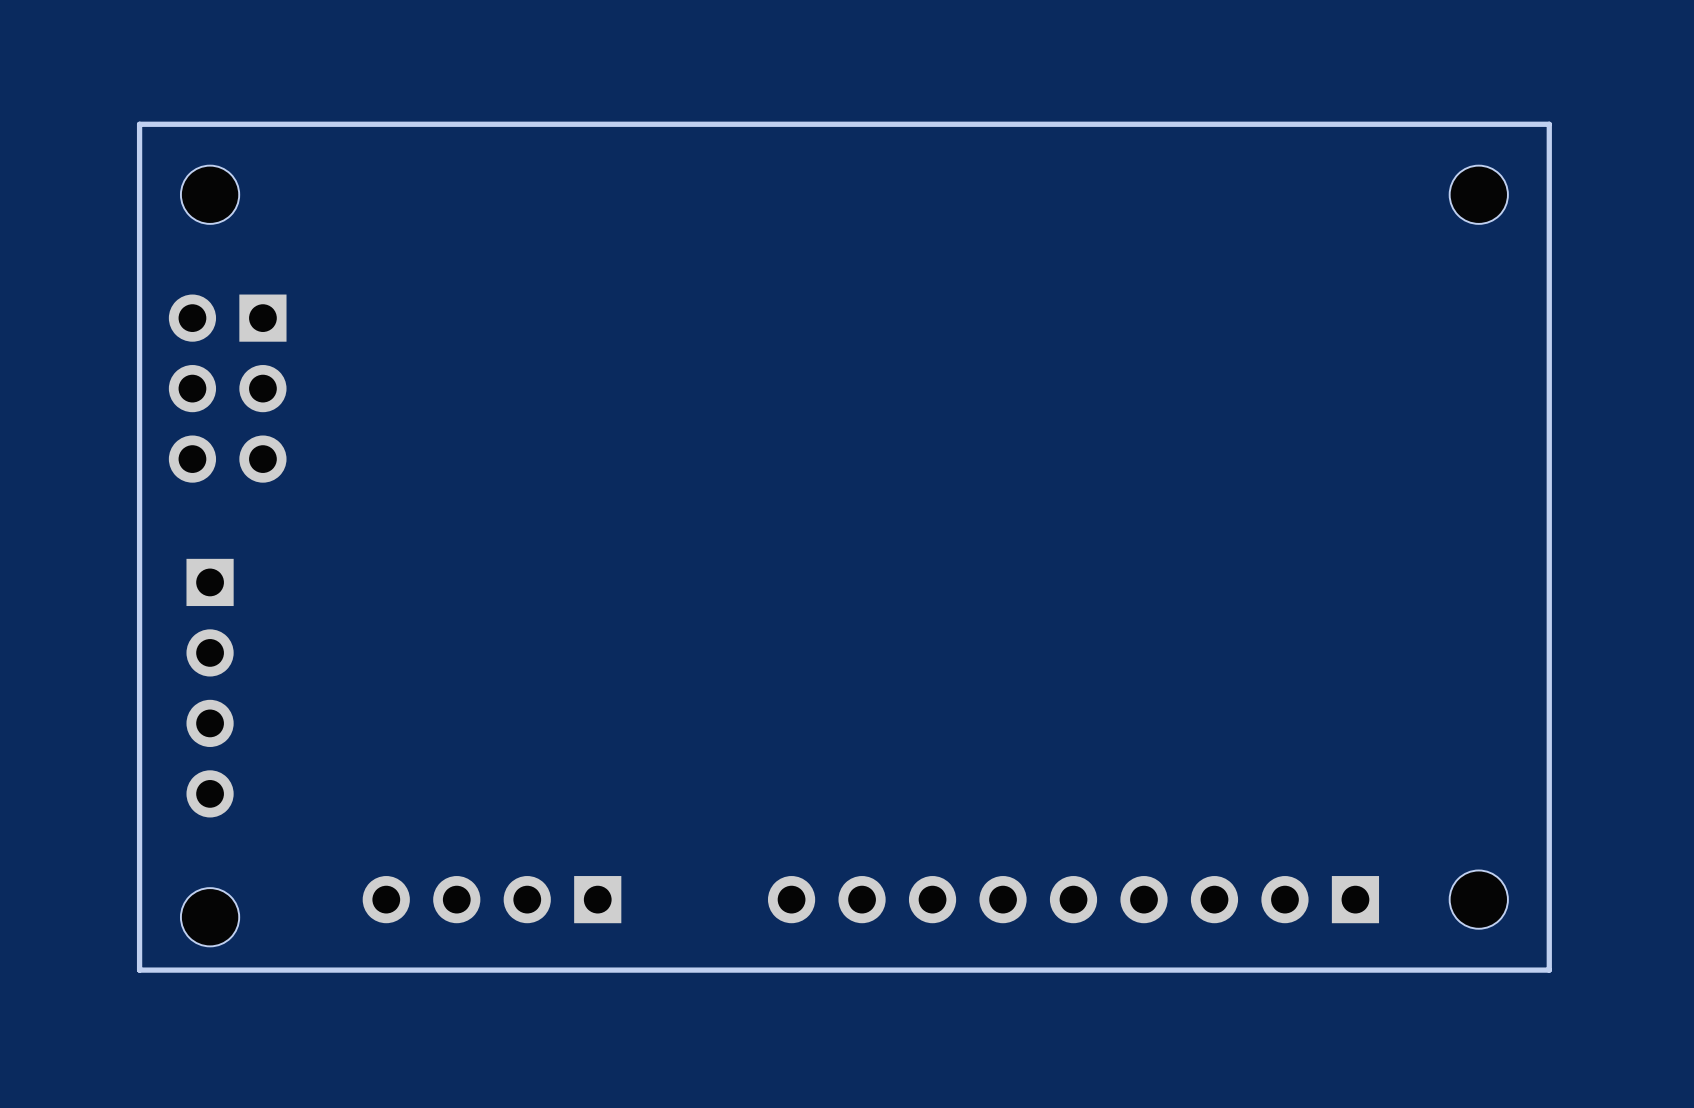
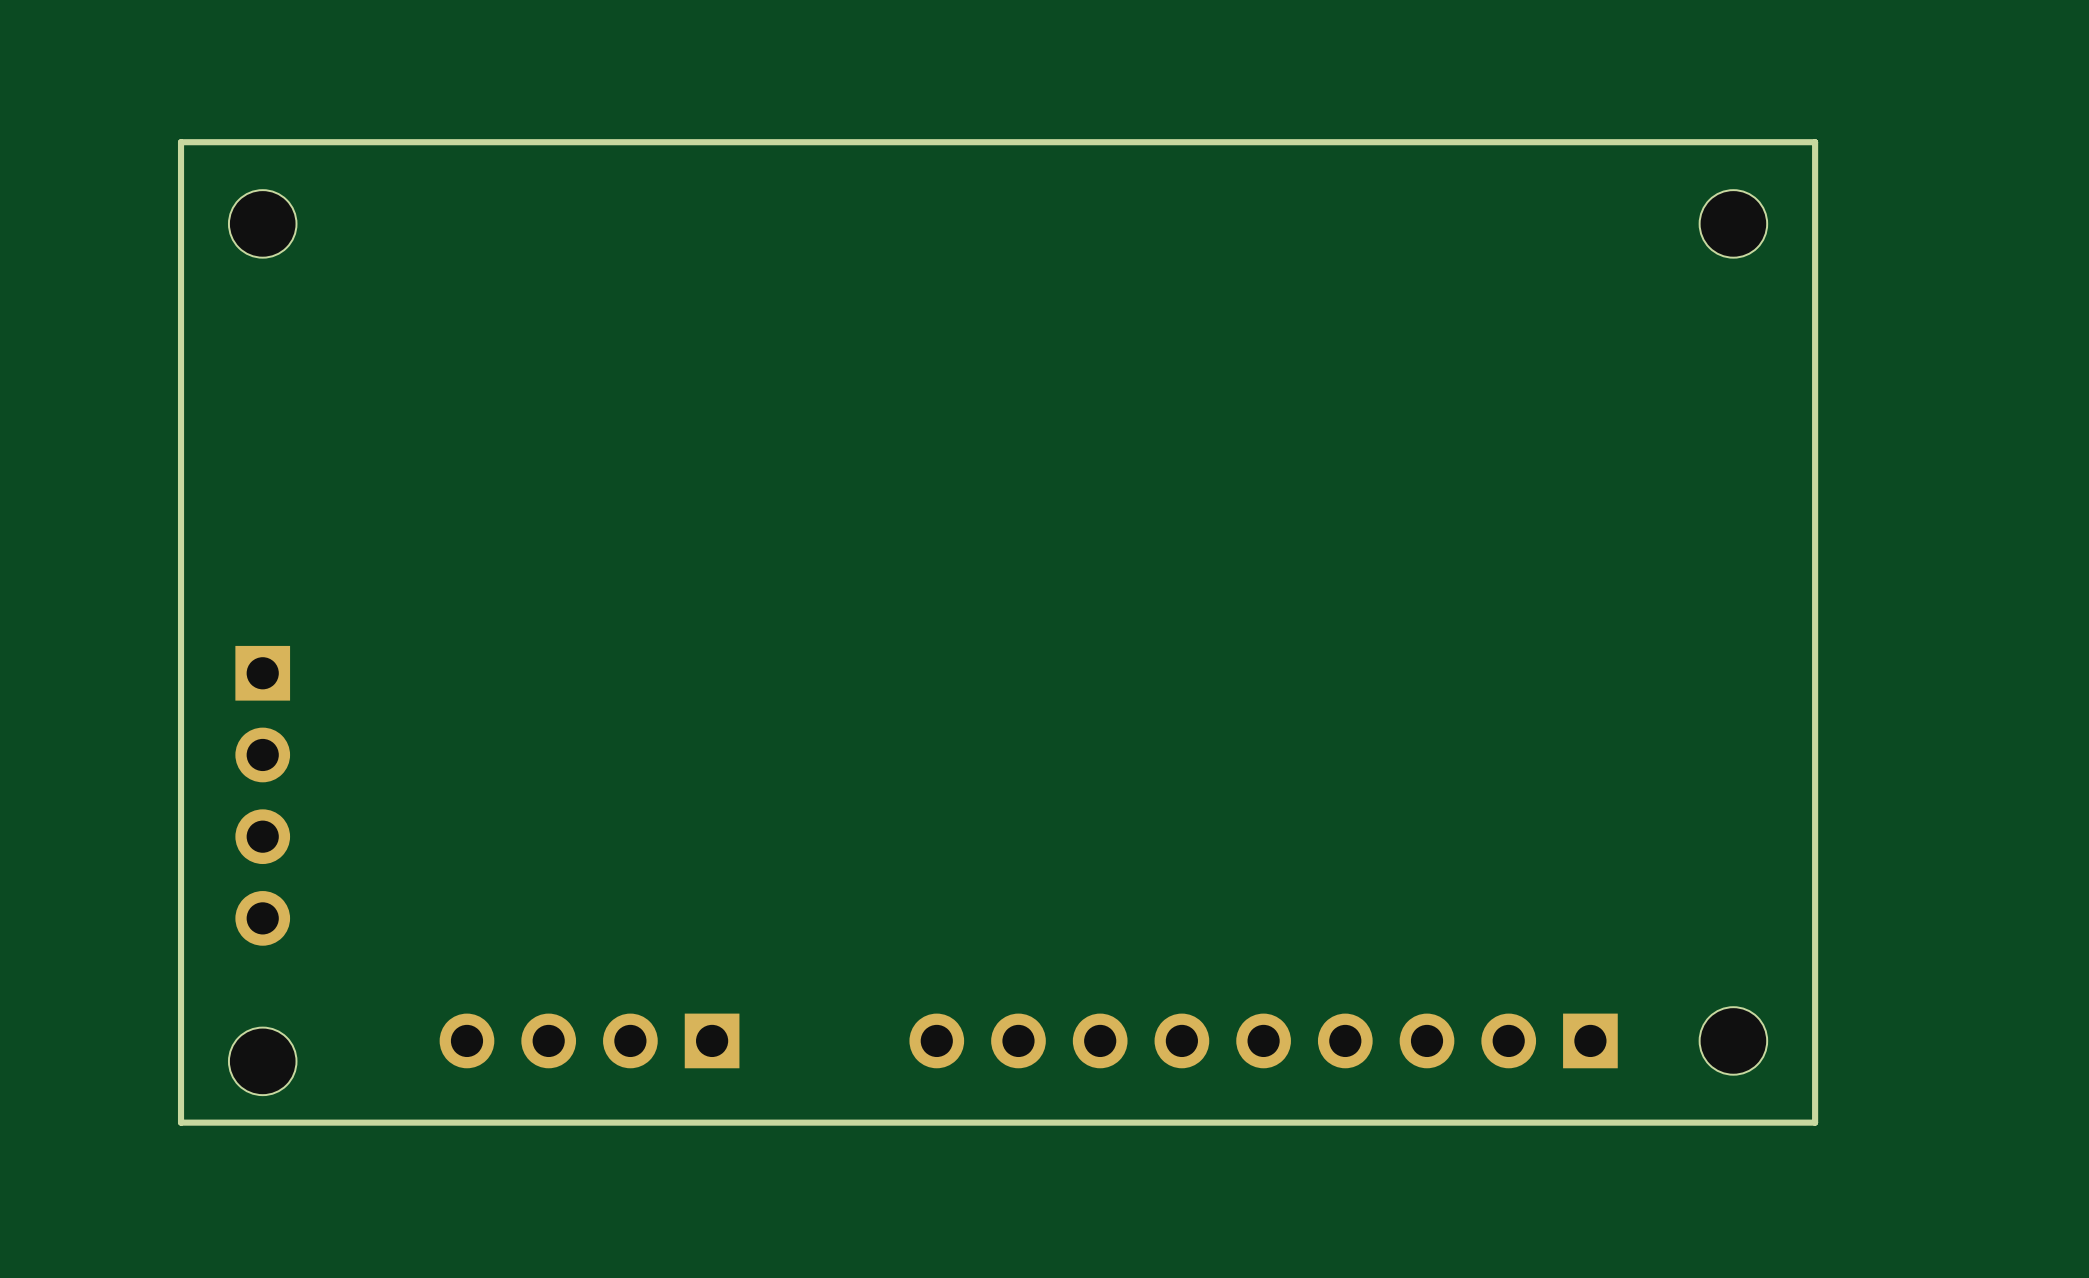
part: (227, 388) -> none

